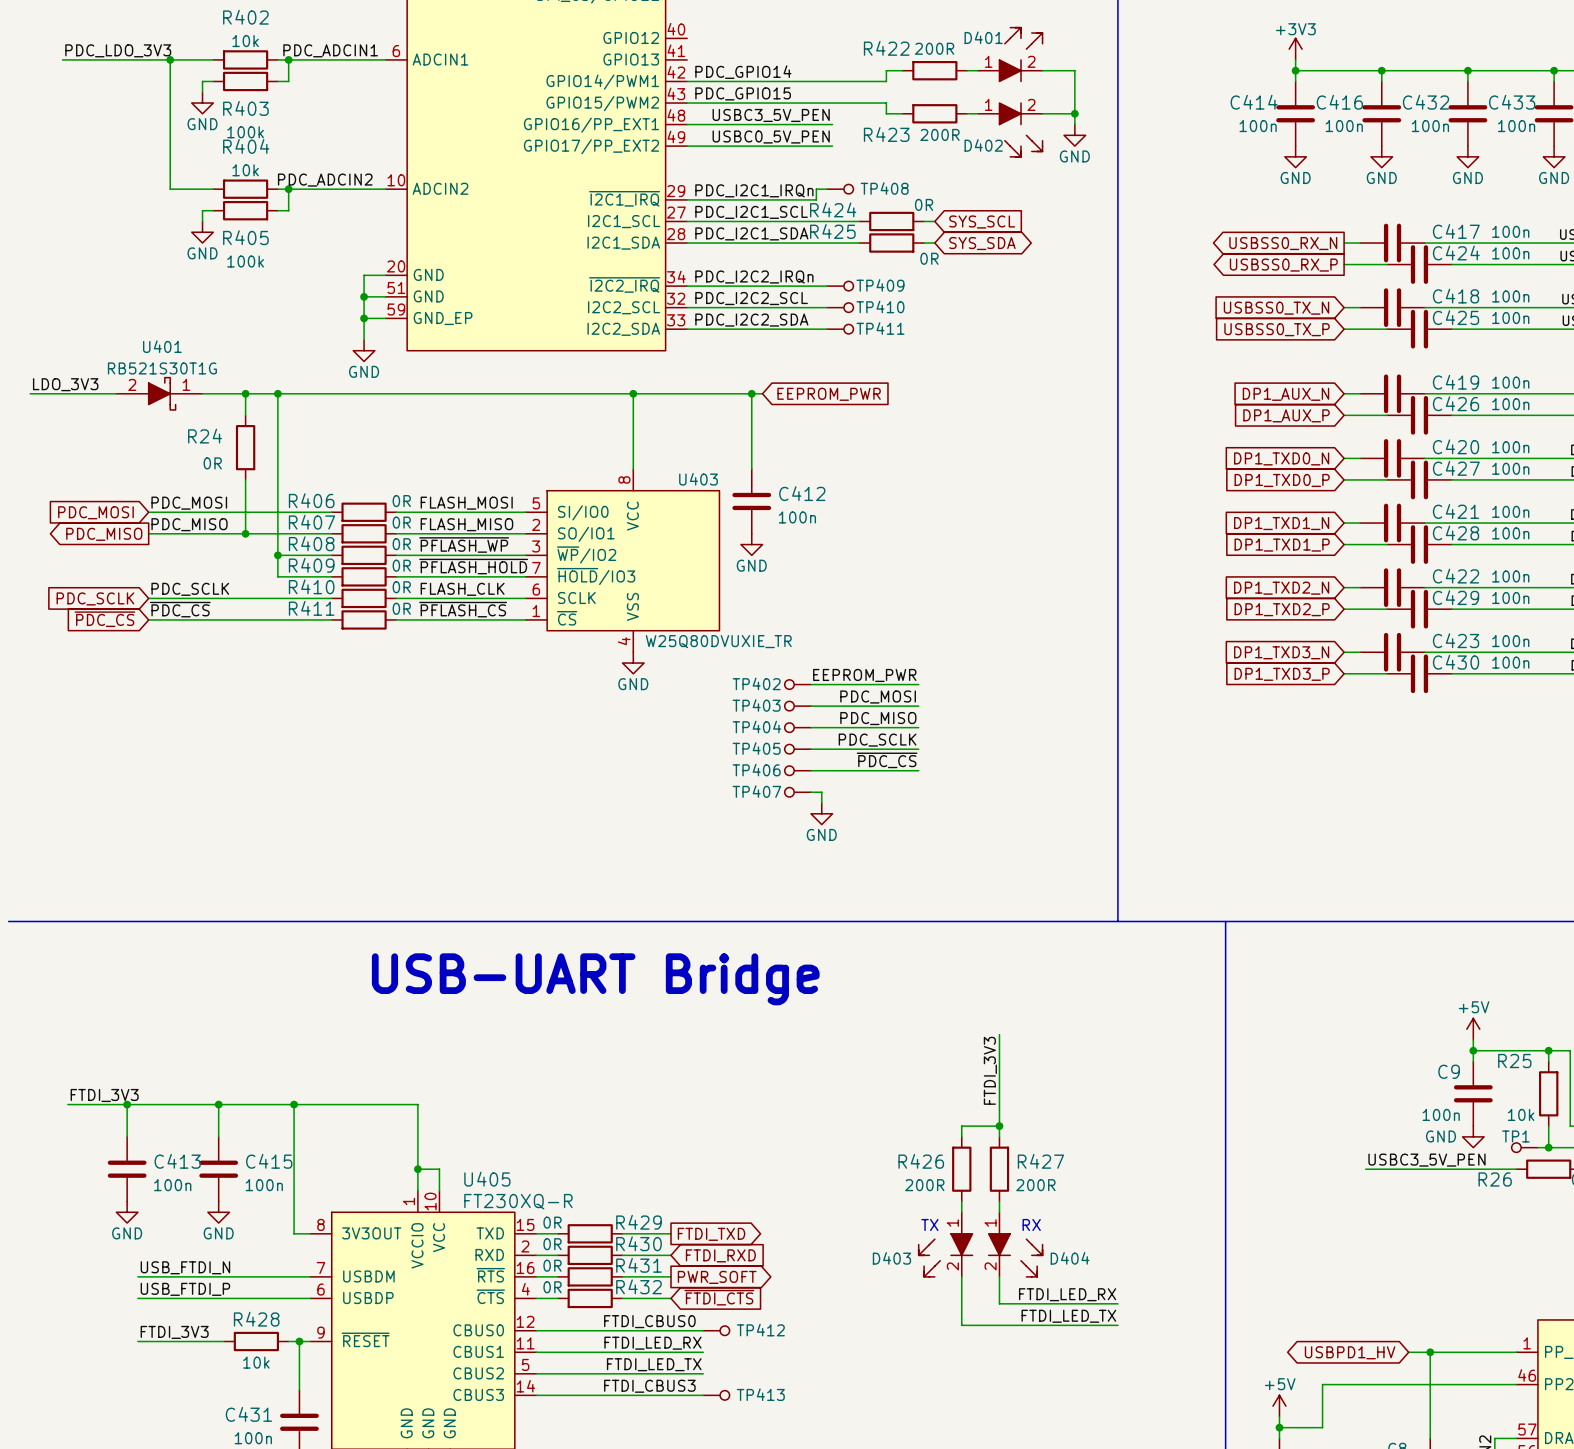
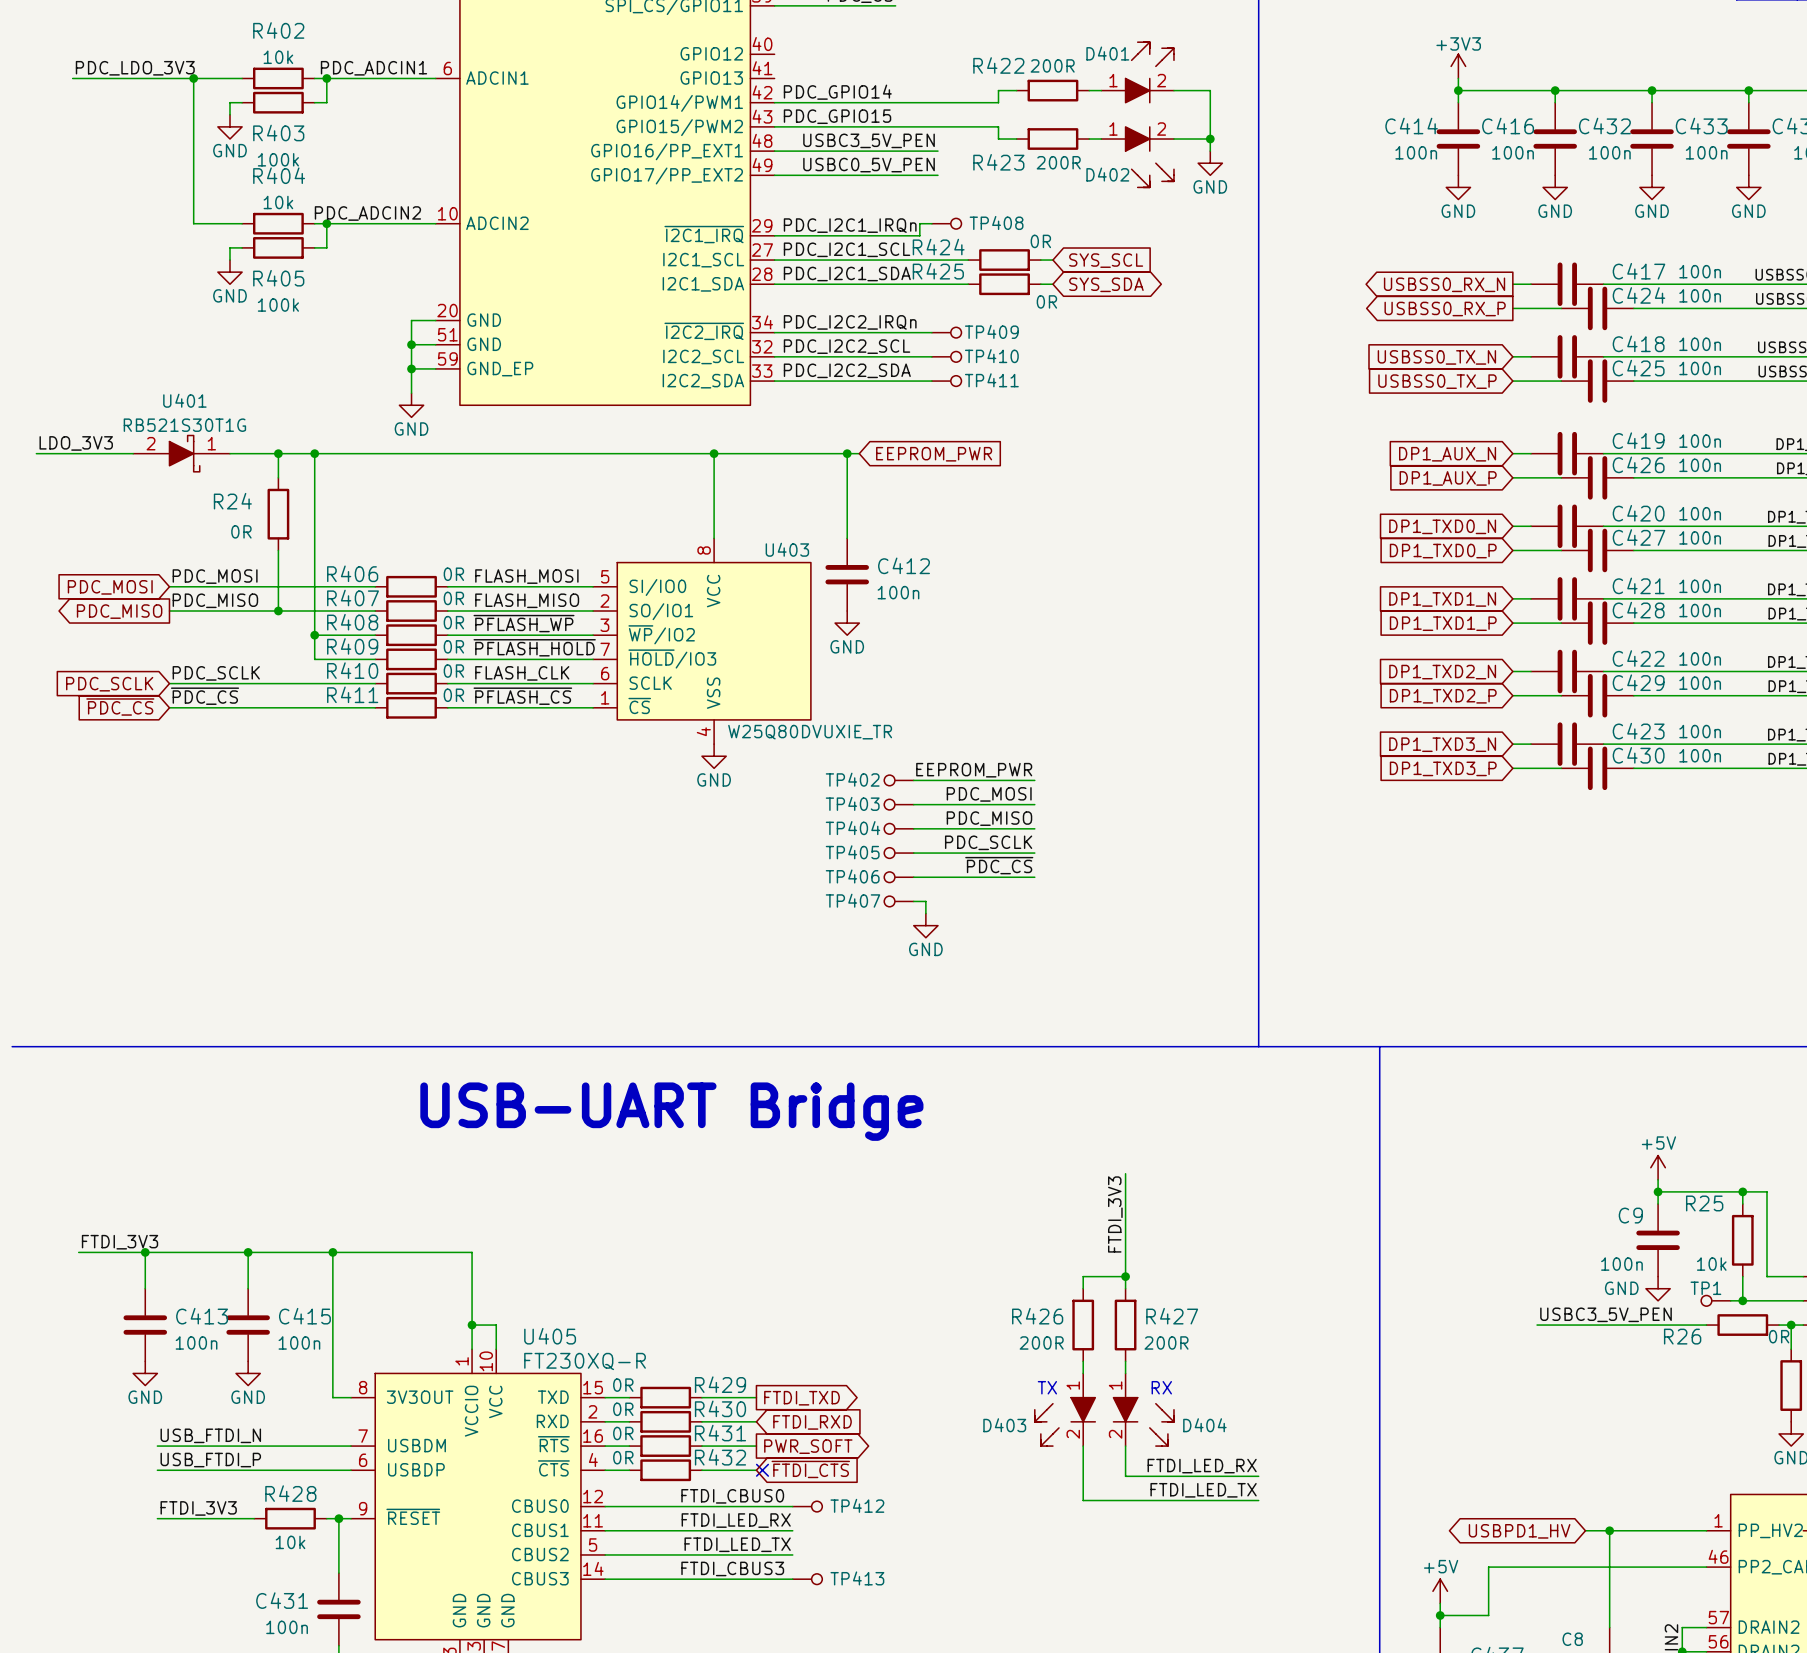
no-connect mark: none -> (762, 1470)

